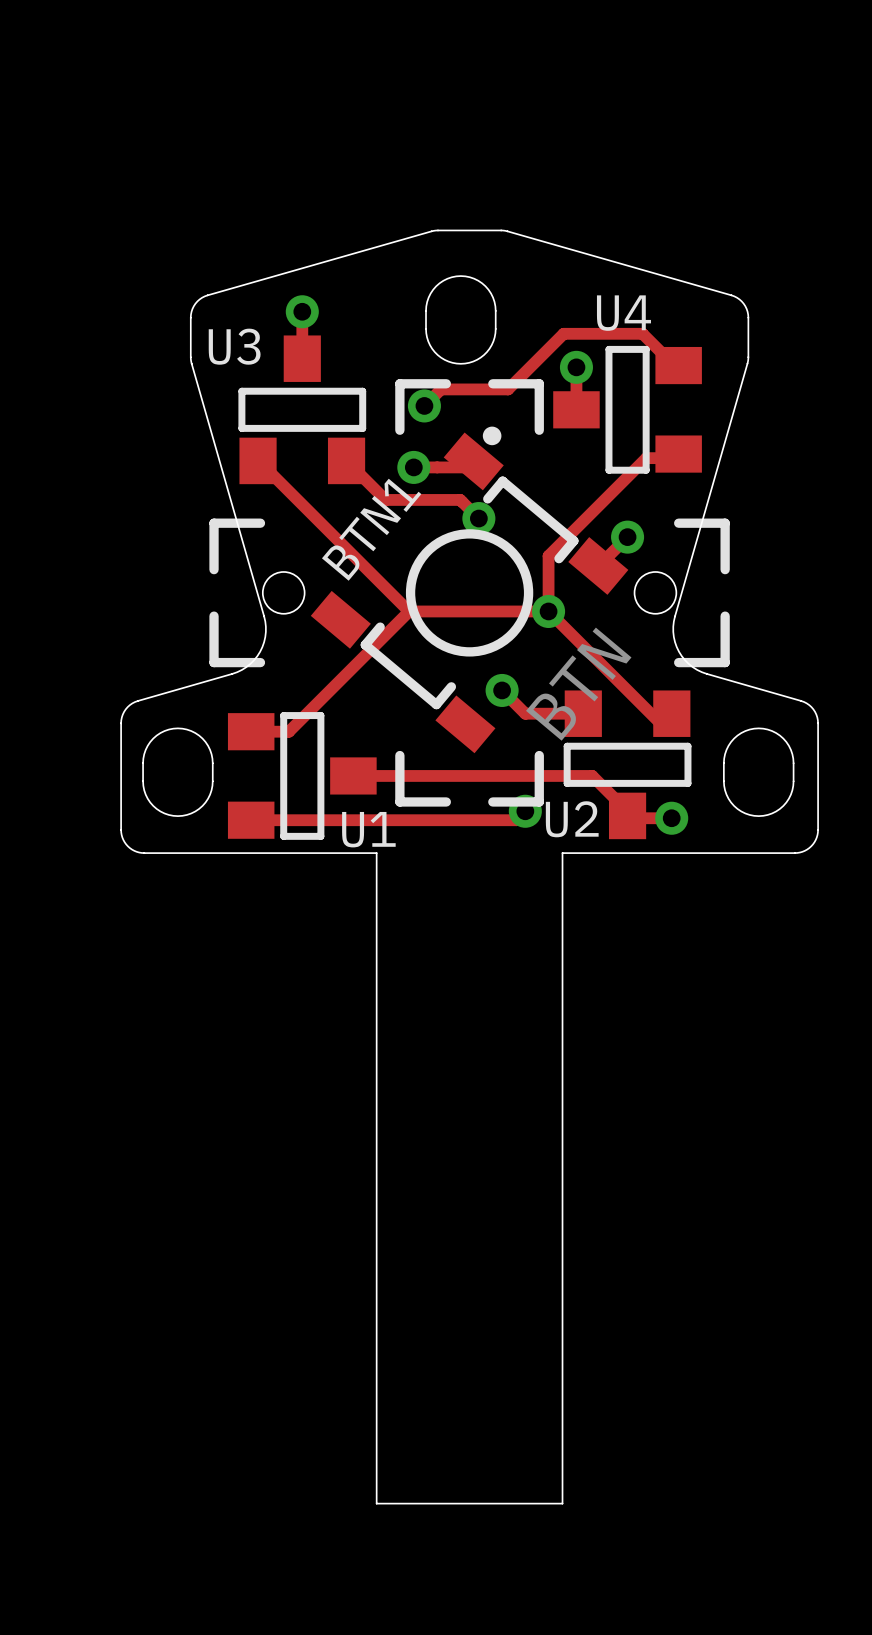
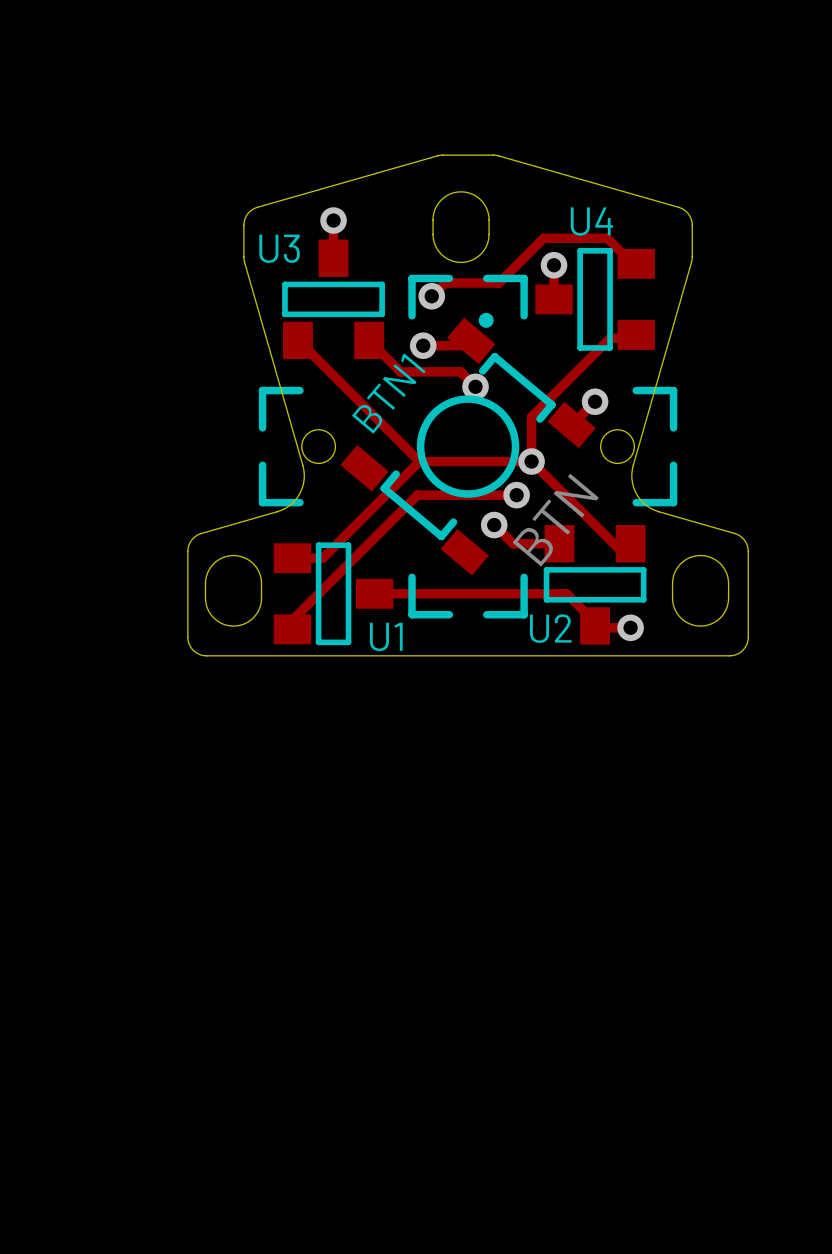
track: none -> (516, 495) (417, 495) (292, 622)
track: (525, 811) (516, 820) (251, 820) -> none
via position: (525, 811) -> (516, 495)
board edge: (376, 853) (376, 1503) (562, 1503) (562, 853) -> (393, 655) (542, 655)

